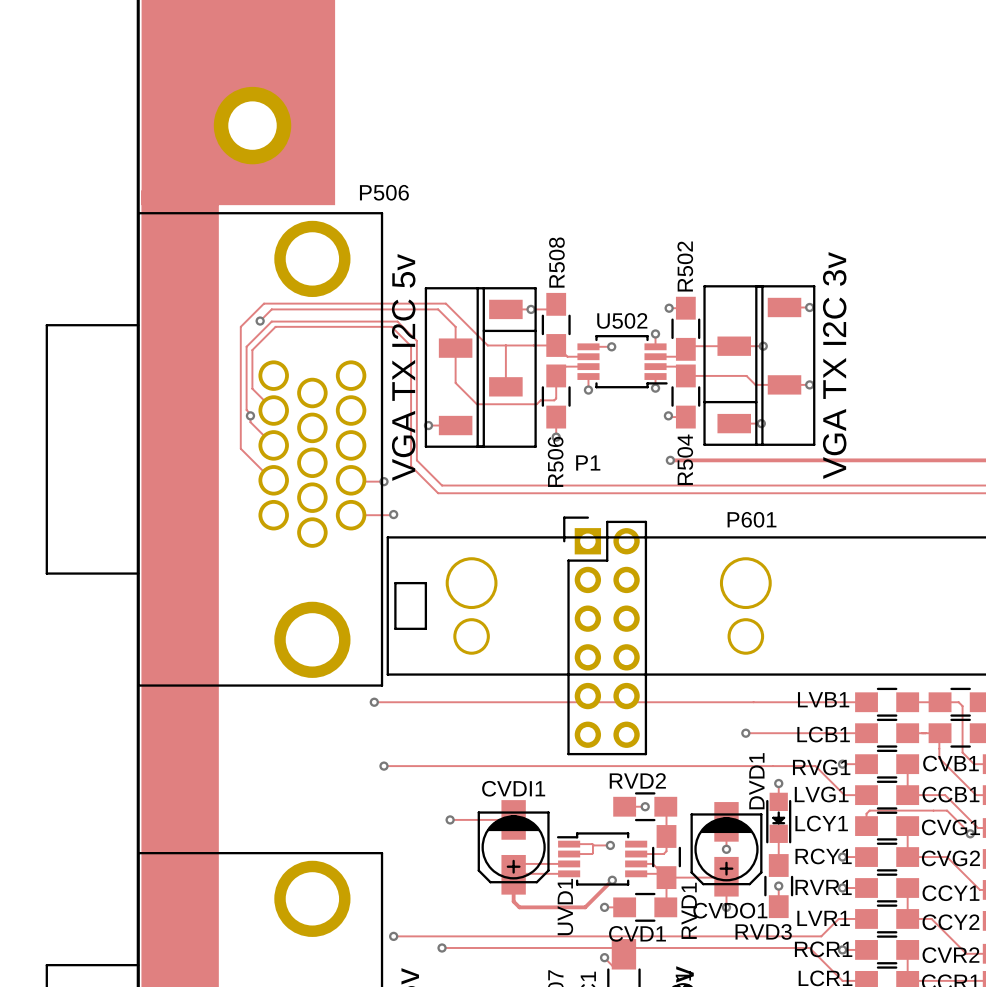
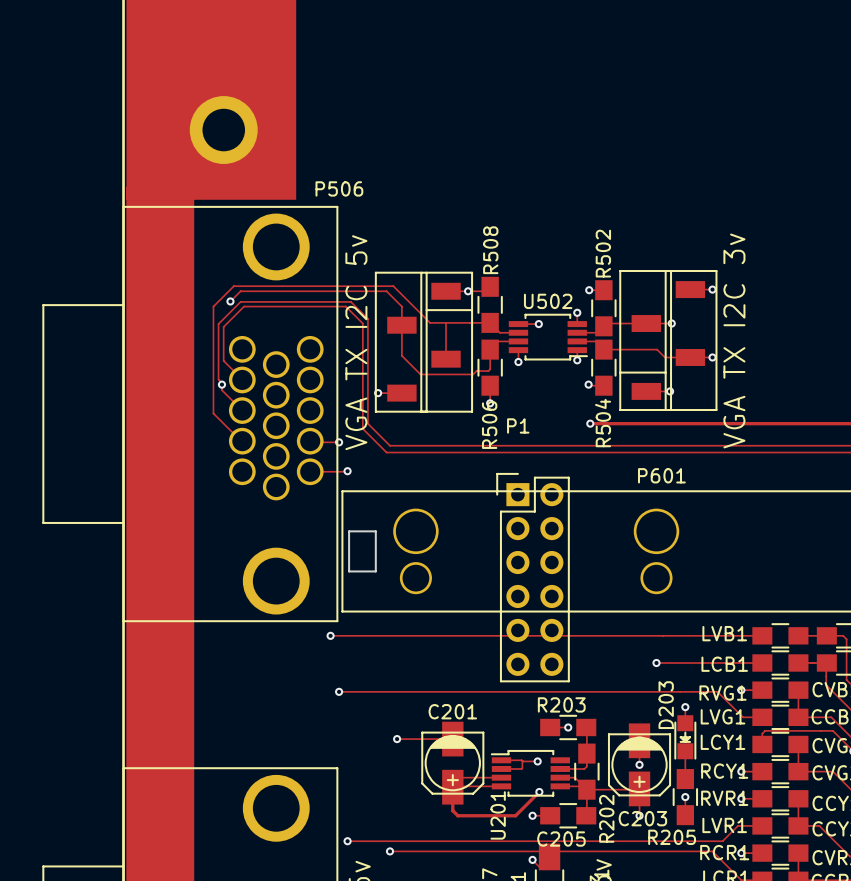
RVD2 name: RVD2 (637, 780) -> R203 (561, 704)
DVD1 name: DVD1 (756, 781) -> D203 (666, 705)
CVDI1 name: CVDI1 (513, 788) -> C201 (452, 711)
UVD1 name: UVD1 (565, 907) -> U201 (498, 815)
RVD1 name: RVD1 (689, 910) -> R202 (606, 818)
CVDO1 name: CVDO1 (730, 910) -> C203 (642, 818)
RVD3 name: RVD3 (763, 931) -> R205 (672, 837)
CVD1 name: CVD1 (637, 933) -> C205 (561, 839)

